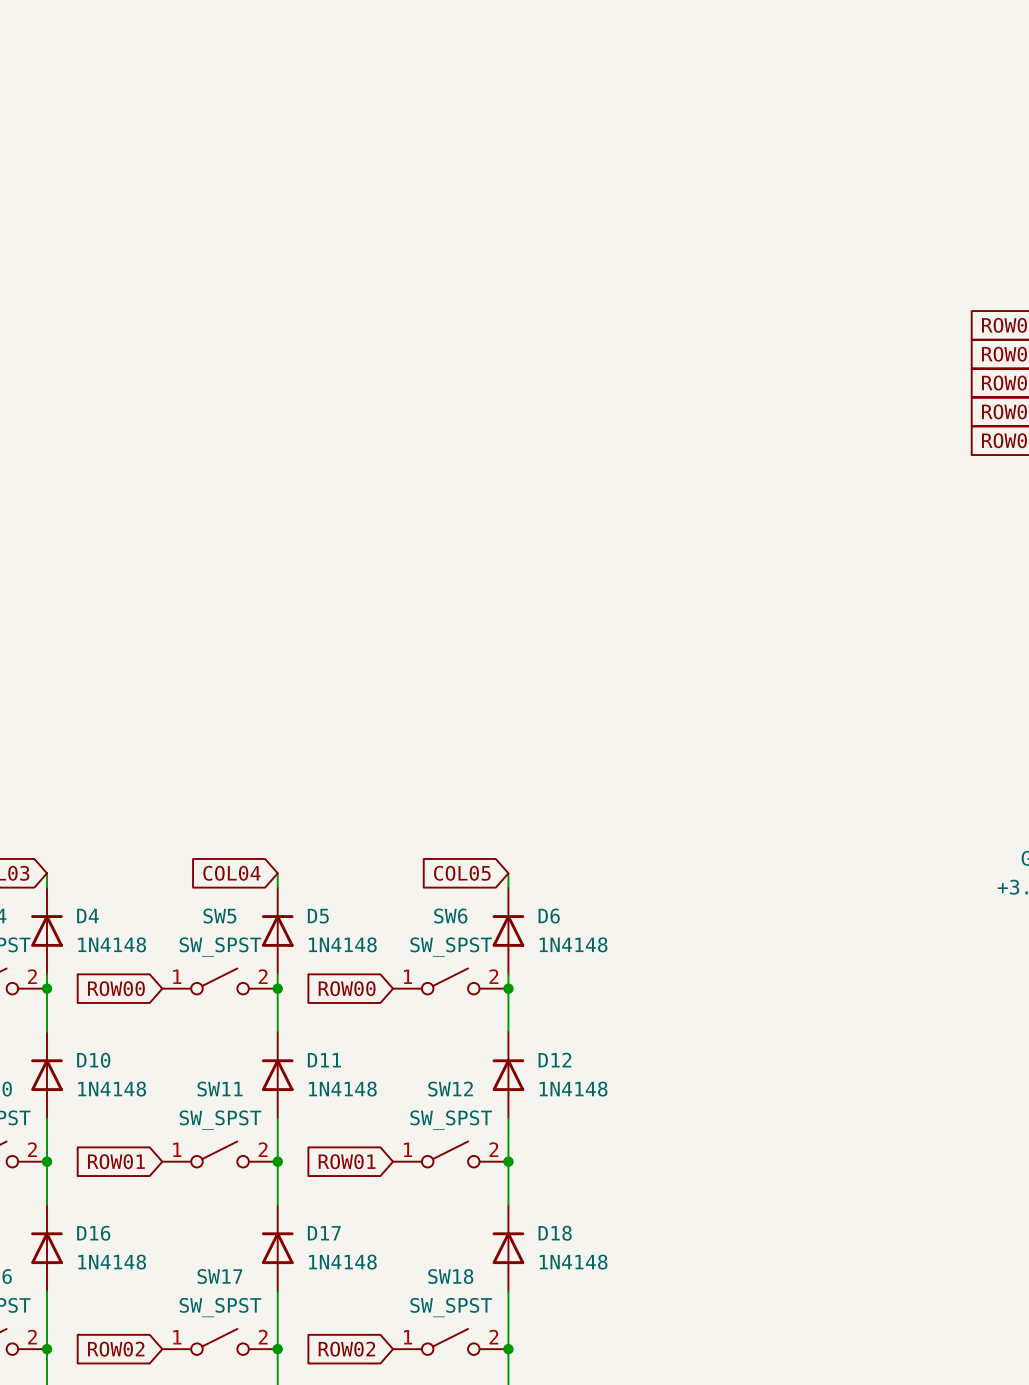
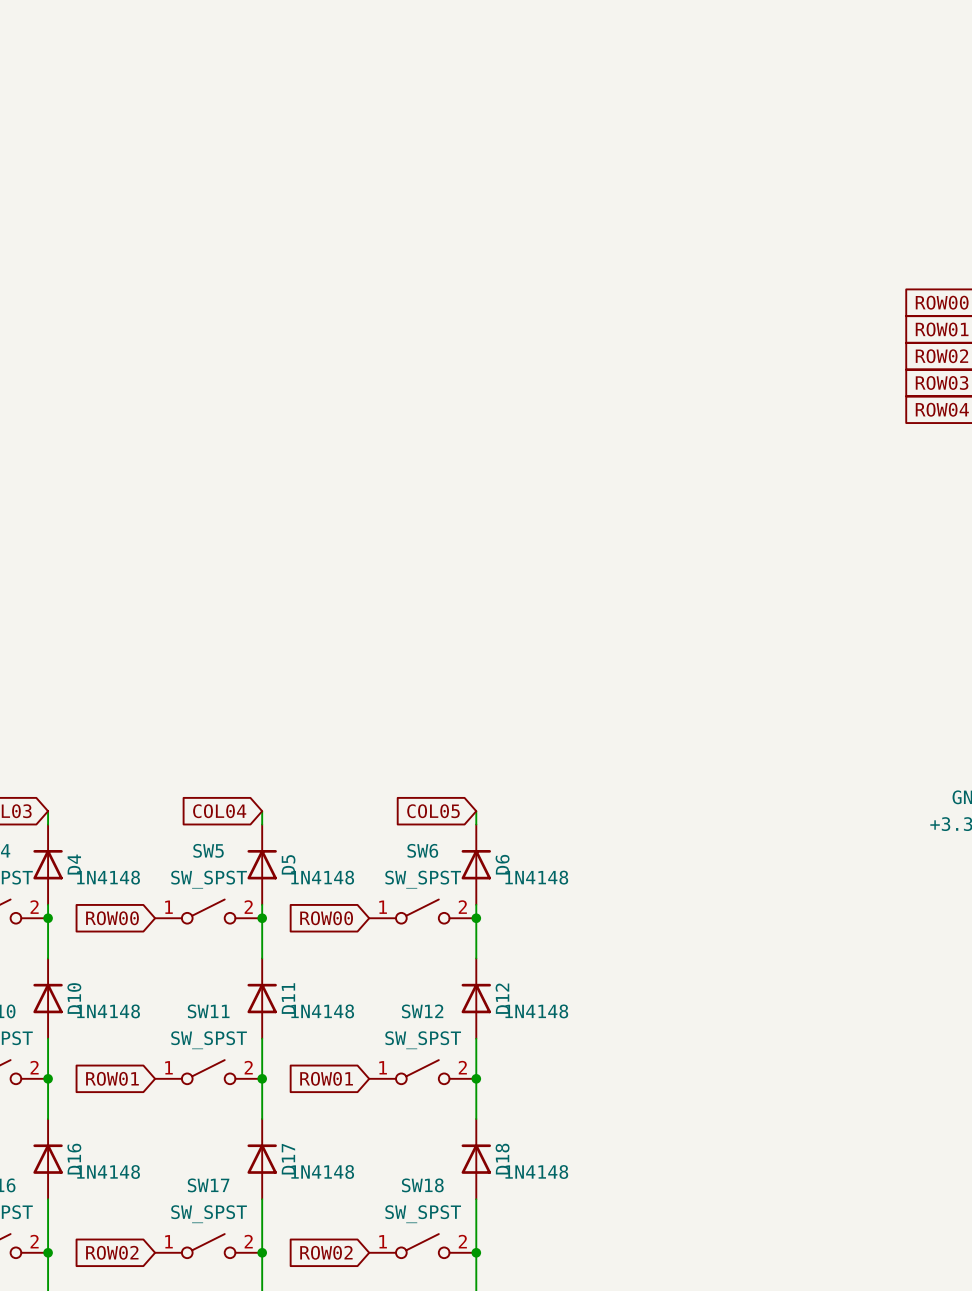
D4 name rotation: 0° (87, 916) -> 90° counterclockwise (74, 864)
D5 name rotation: 0° (318, 916) -> 90° counterclockwise (288, 864)
D6 name rotation: 0° (549, 916) -> 90° counterclockwise (502, 864)
D10 name rotation: 0° (93, 1060) -> 90° counterclockwise (74, 998)
D11 name rotation: 0° (324, 1060) -> 90° counterclockwise (288, 998)
D12 name rotation: 0° (554, 1060) -> 90° counterclockwise (502, 998)
D16 name rotation: 0° (93, 1233) -> 90° counterclockwise (74, 1159)
D17 name rotation: 0° (324, 1233) -> 90° counterclockwise (288, 1159)
D18 name rotation: 0° (555, 1233) -> 90° counterclockwise (502, 1159)

